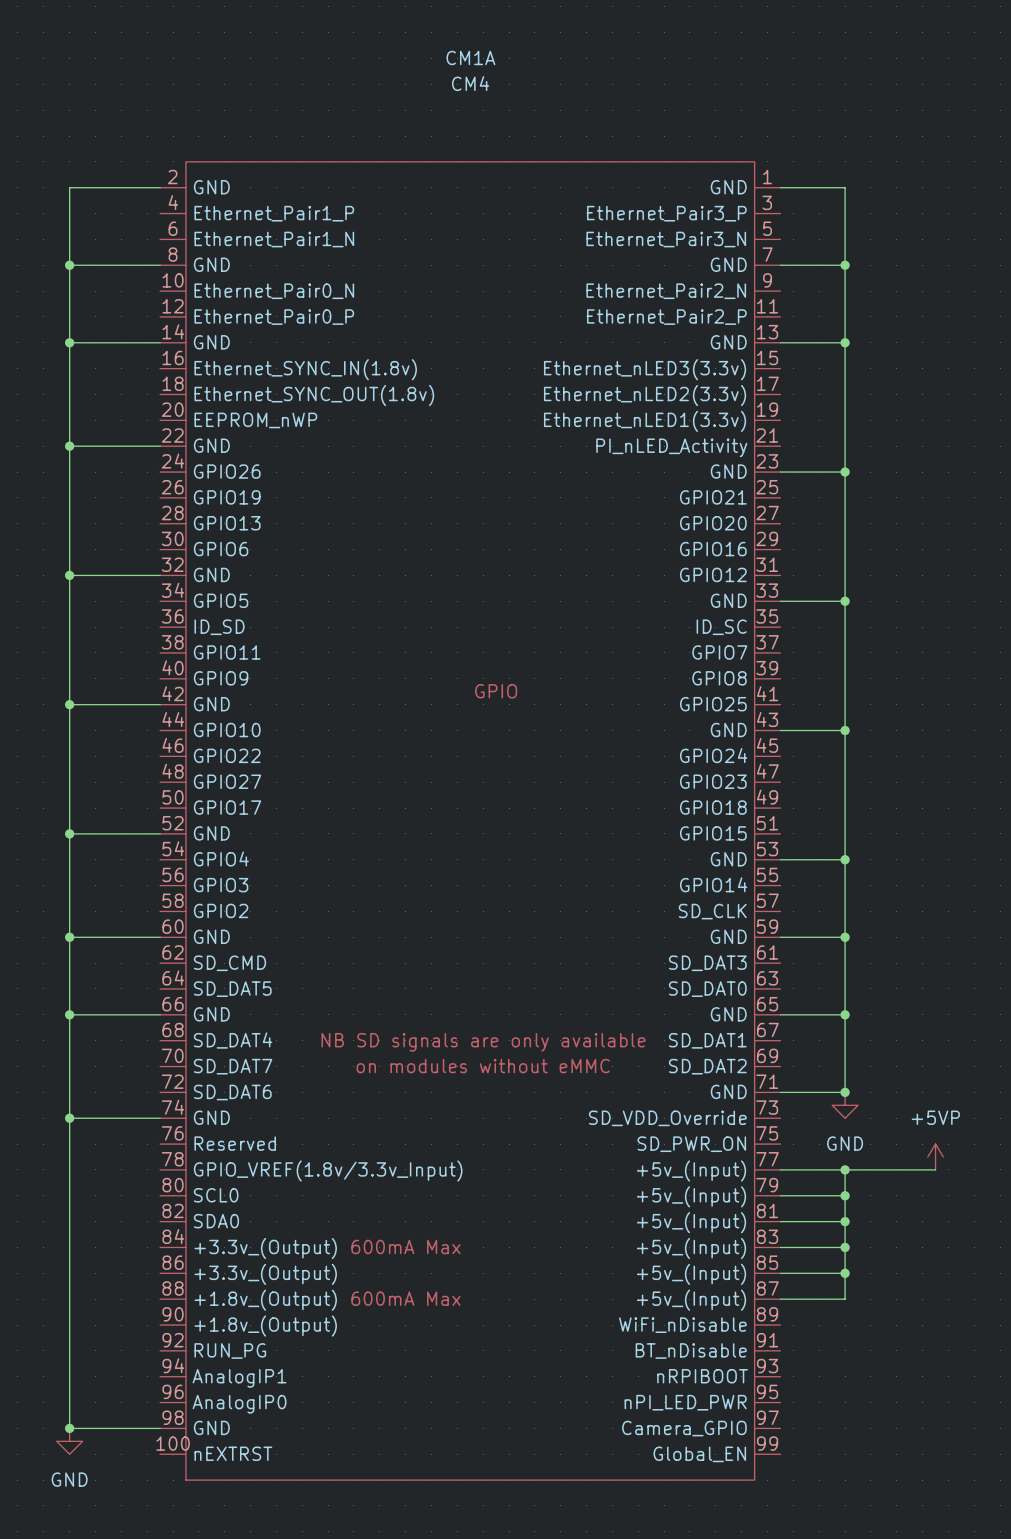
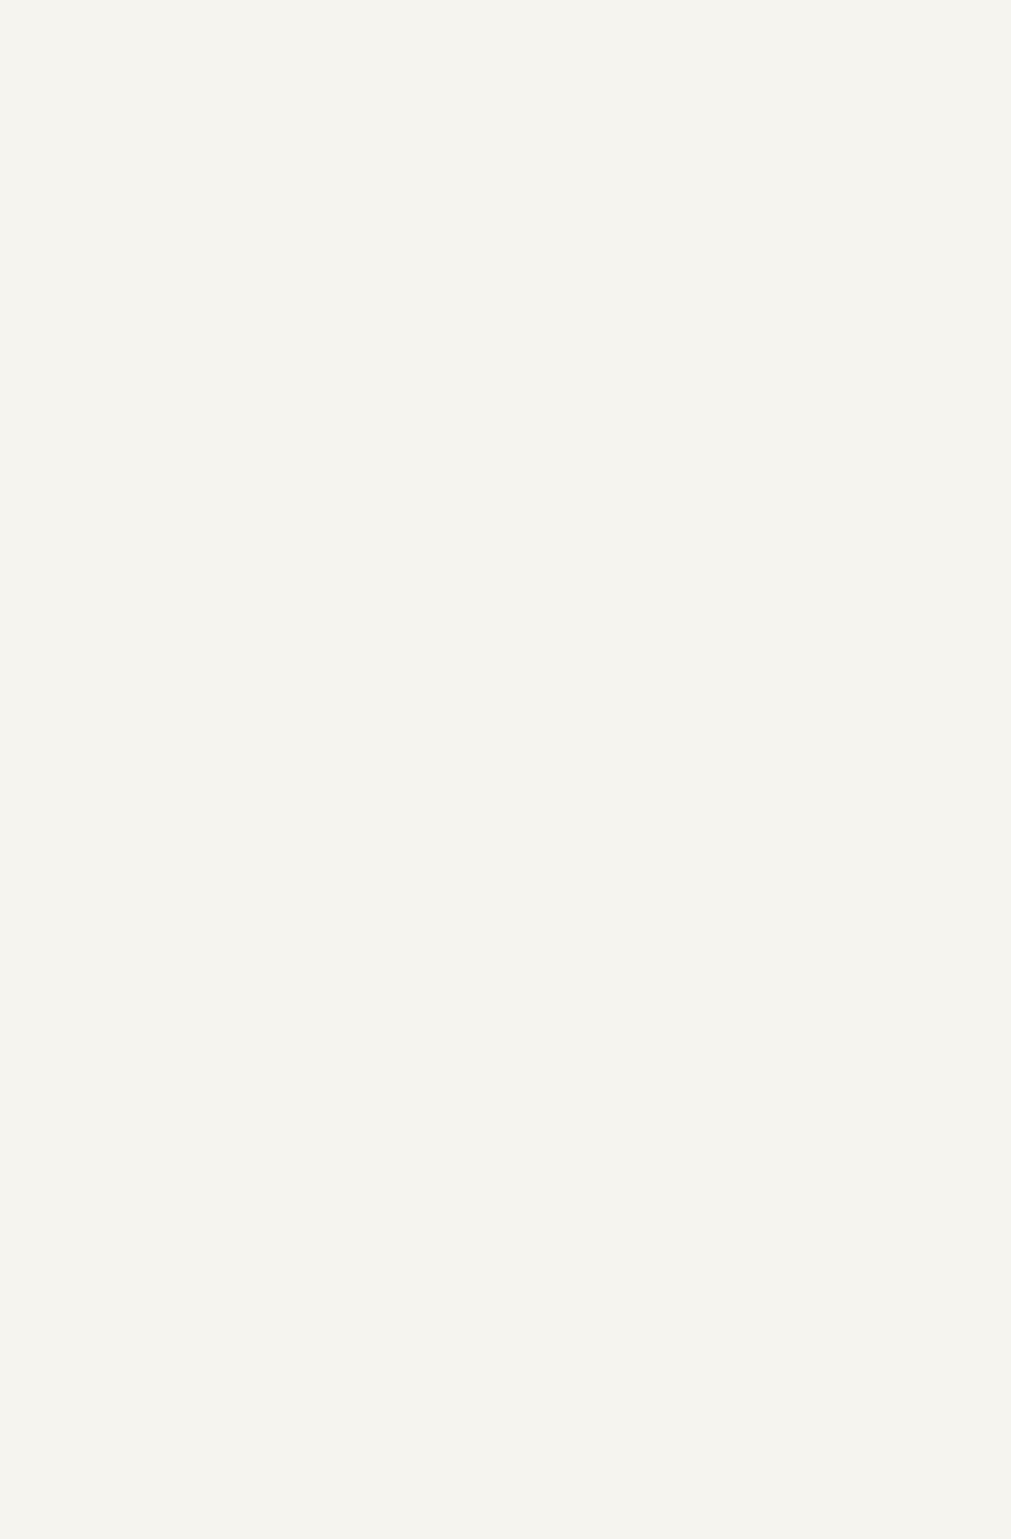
wire: (160, 187) (69, 187) (69, 1428) (160, 1428) -> none
wire: (780, 187) (845, 187) (845, 1092) (780, 1092) -> none
wire: (69, 265) (160, 265) -> none
junction: (69, 265) -> none
wire: (780, 265) (845, 265) -> none
junction: (845, 265) -> none
wire: (69, 342) (160, 342) -> none
junction: (69, 342) -> none
wire: (780, 342) (845, 342) -> none
junction: (845, 342) -> none
wire: (69, 446) (160, 446) -> none
junction: (69, 446) -> none
wire: (780, 472) (845, 472) -> none
junction: (845, 472) -> none
wire: (69, 575) (160, 575) -> none
junction: (69, 575) -> none
wire: (780, 601) (845, 601) -> none
junction: (845, 601) -> none
wire: (69, 704) (160, 704) -> none
junction: (69, 704) -> none
wire: (780, 730) (845, 730) -> none
junction: (845, 730) -> none
CM1A: CM4 (470, 820) -> none
wire: (69, 833) (160, 833) -> none
junction: (69, 833) -> none
wire: (780, 859) (845, 859) -> none
junction: (845, 859) -> none
wire: (69, 937) (160, 937) -> none
junction: (69, 937) -> none
wire: (780, 937) (845, 937) -> none
junction: (845, 937) -> none
wire: (69, 1014) (160, 1014) -> none
junction: (69, 1014) -> none
wire: (780, 1014) (845, 1014) -> none
junction: (845, 1014) -> none
junction: (845, 1092) -> none
power symbol: GND (845, 1105) -> none
wire: (69, 1118) (160, 1118) -> none
junction: (69, 1118) -> none
power symbol: +5VP (935, 1157) -> none
wire: (780, 1169) (935, 1169) -> none
wire: (845, 1169) (845, 1299) (780, 1299) -> none
junction: (845, 1169) -> none
wire: (780, 1195) (845, 1195) -> none
junction: (845, 1195) -> none
wire: (780, 1221) (845, 1221) -> none
junction: (845, 1221) -> none
wire: (780, 1247) (845, 1247) -> none
junction: (845, 1247) -> none
wire: (780, 1273) (845, 1273) -> none
junction: (845, 1273) -> none
junction: (69, 1428) -> none
power symbol: GND (69, 1441) -> none

